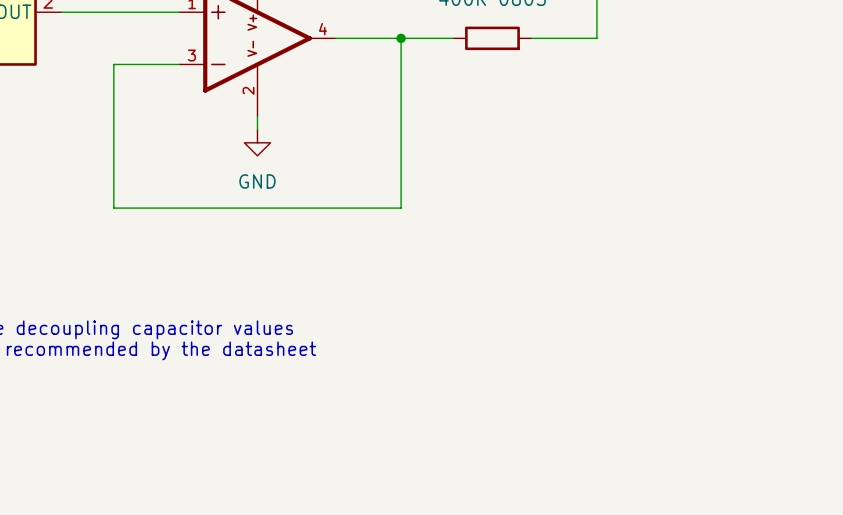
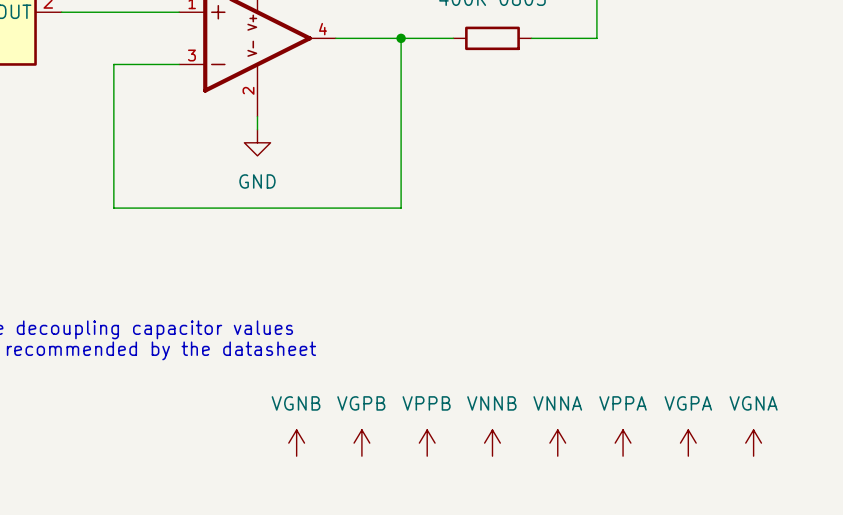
power symbol: none -> VGNB (296, 443)
power symbol: none -> VGPB (361, 443)
power symbol: none -> VPPB (427, 443)
power symbol: none -> VNNB (492, 443)
power symbol: none -> VNNA (557, 443)
power symbol: none -> VPPA (623, 443)
power symbol: none -> VGPA (688, 443)
power symbol: none -> VGNA (753, 443)

